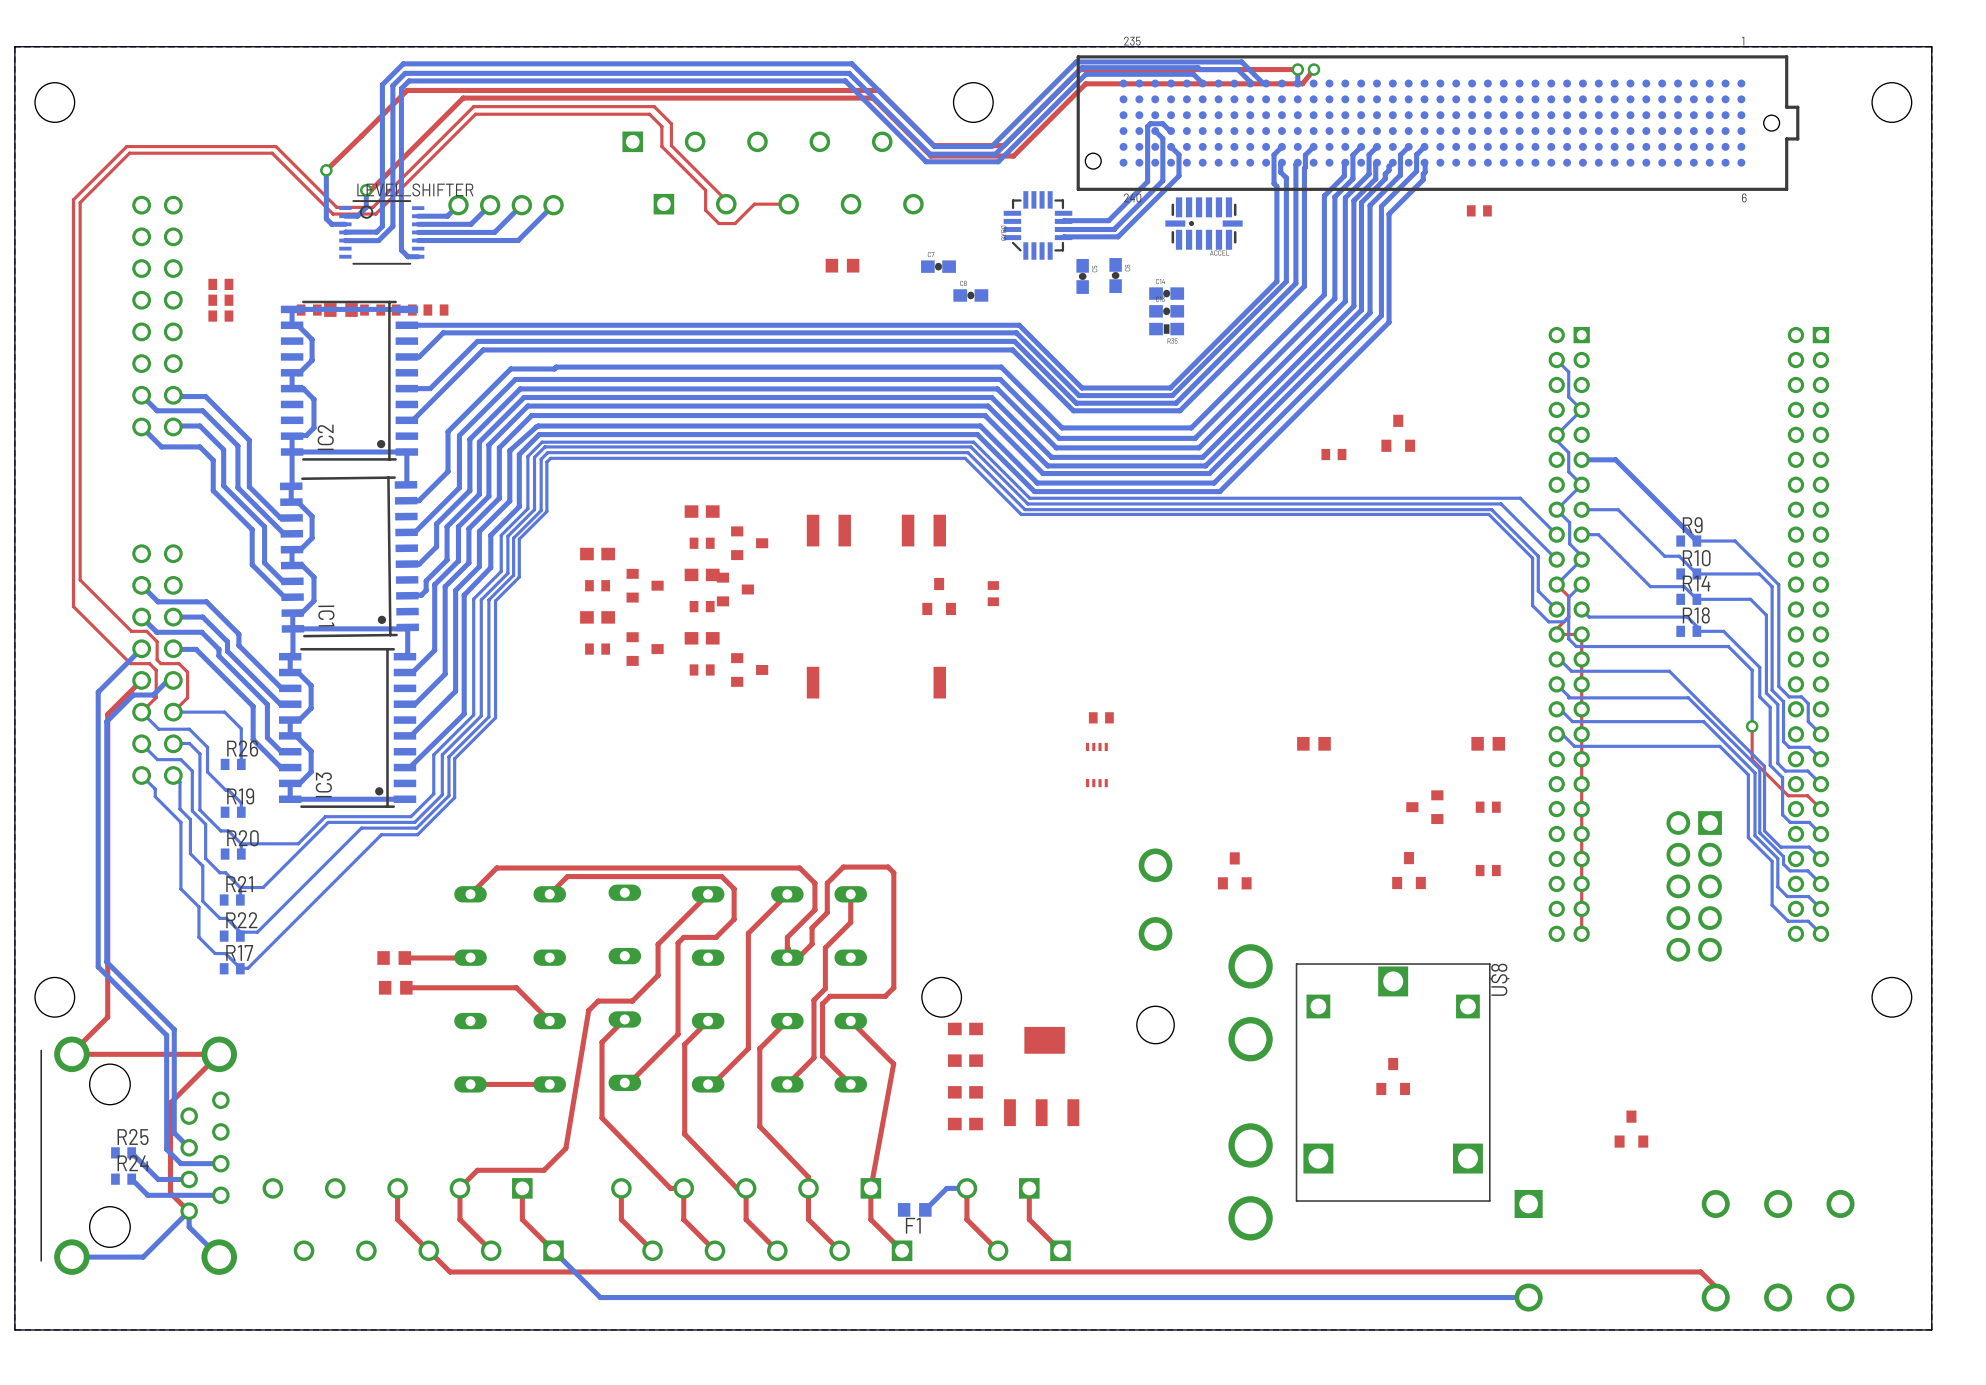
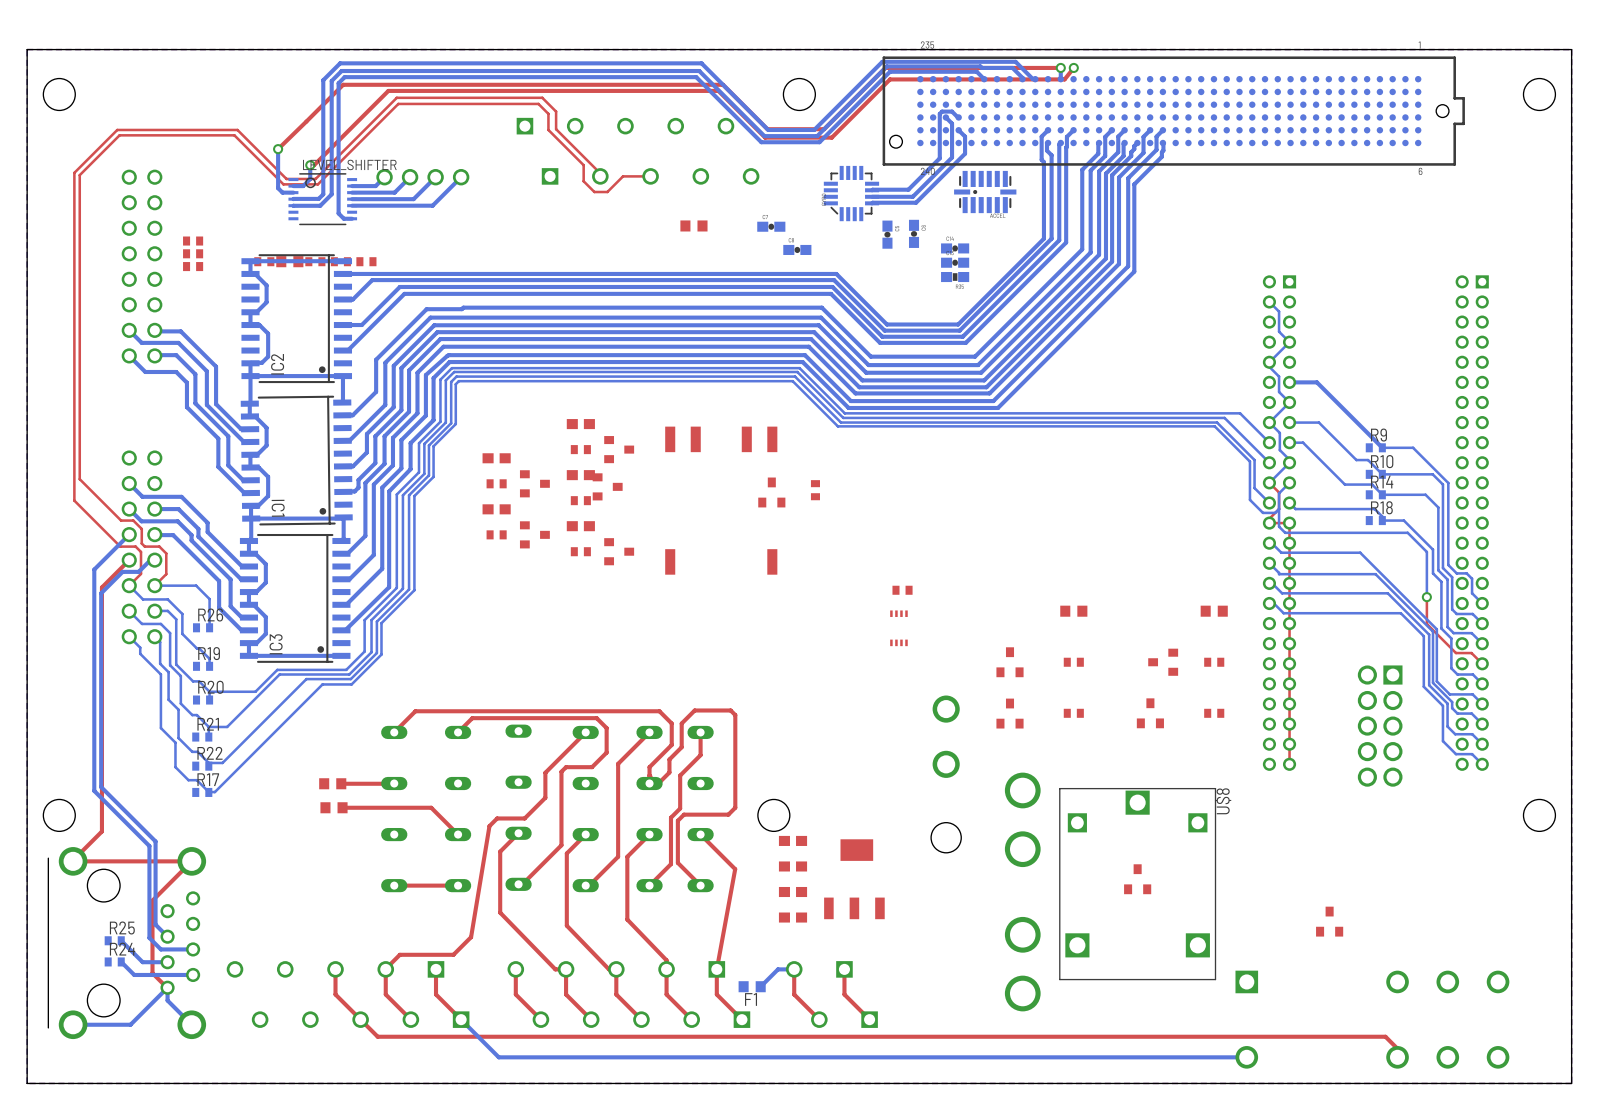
part: (1479, 210) -> none
part: (1398, 433) -> none
part: (1333, 454) -> none
part: none -> (1009, 662)
part: none -> (1073, 662)
part: none -> (1073, 713)

